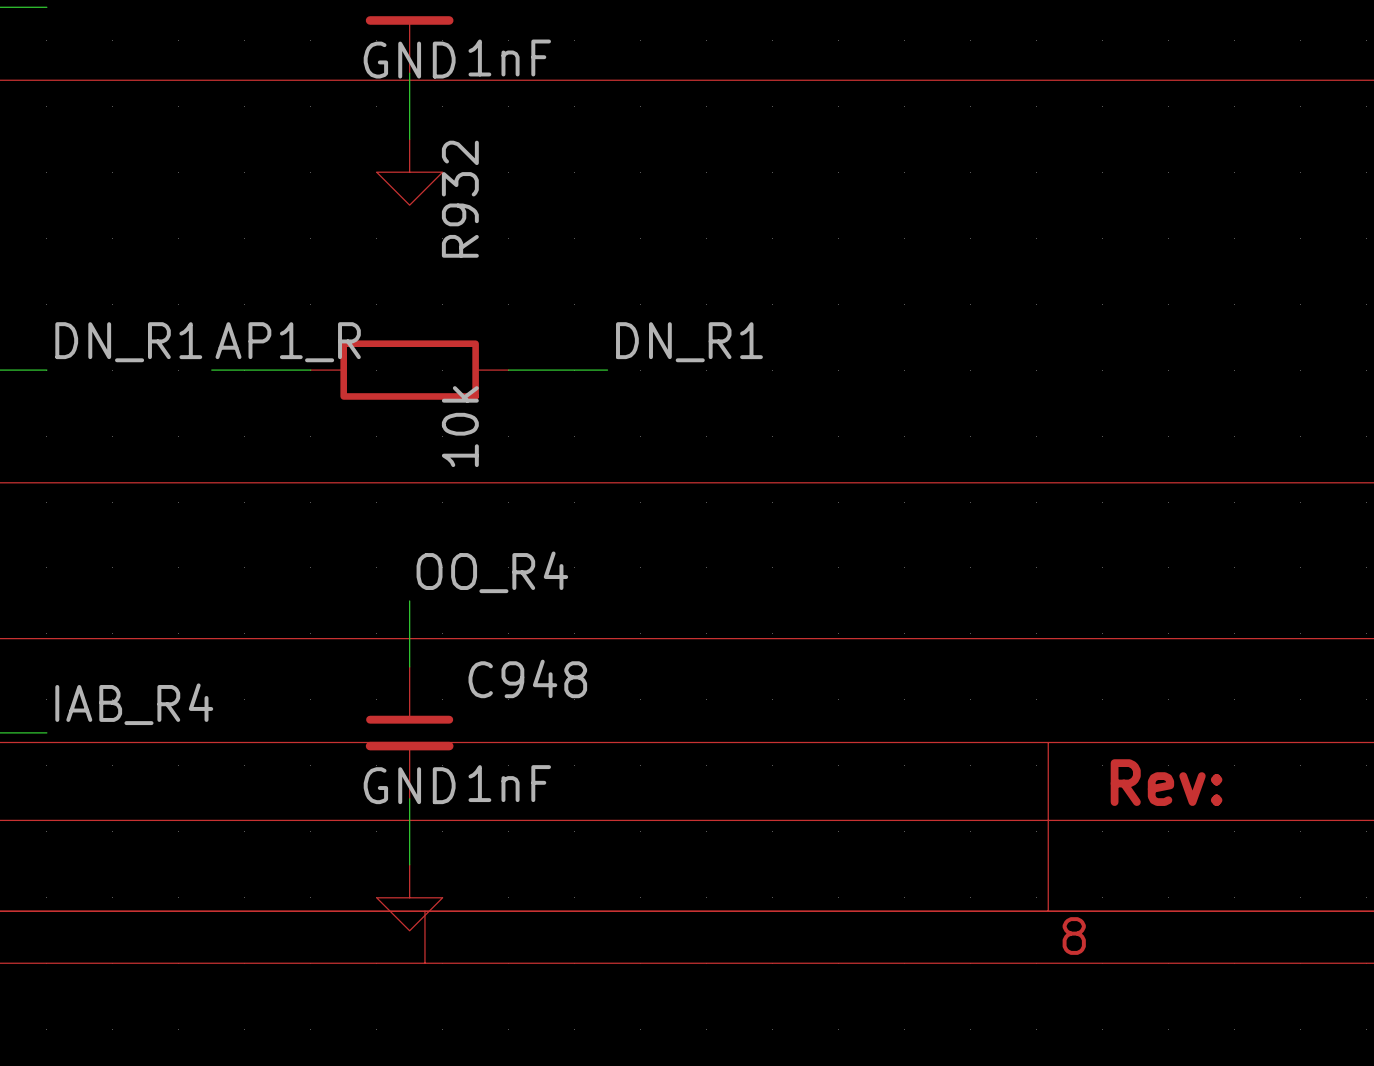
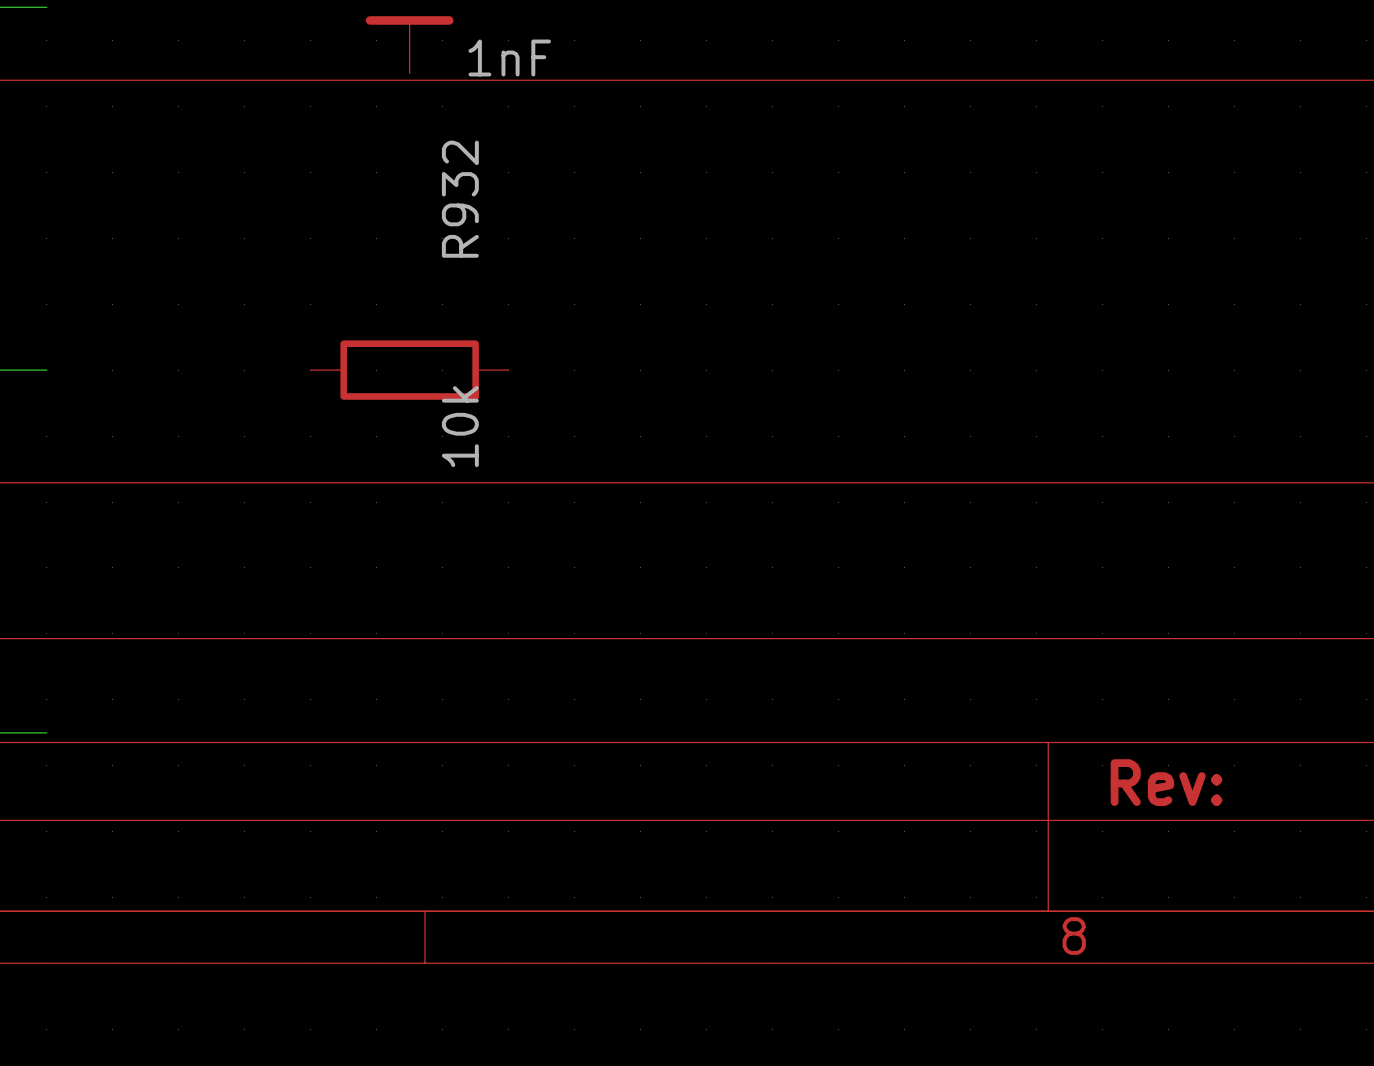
wire: (409, 73) (409, 139) -> none
power symbol: GND (409, 172) -> none
label: DN_R1 (128, 342) -> none
label: AP1_R (288, 342) -> none
label: DN_R1 (689, 342) -> none
wire: (211, 370) (310, 370) -> none
wire: (508, 370) (607, 370) -> none
label: OO_R4 (492, 572) -> none
wire: (409, 600) (409, 666) -> none
label: IAB_R4 (134, 704) -> none
C948: 1nF (409, 732) -> none
wire: (409, 798) (409, 864) -> none
power symbol: GND (409, 897) -> none

